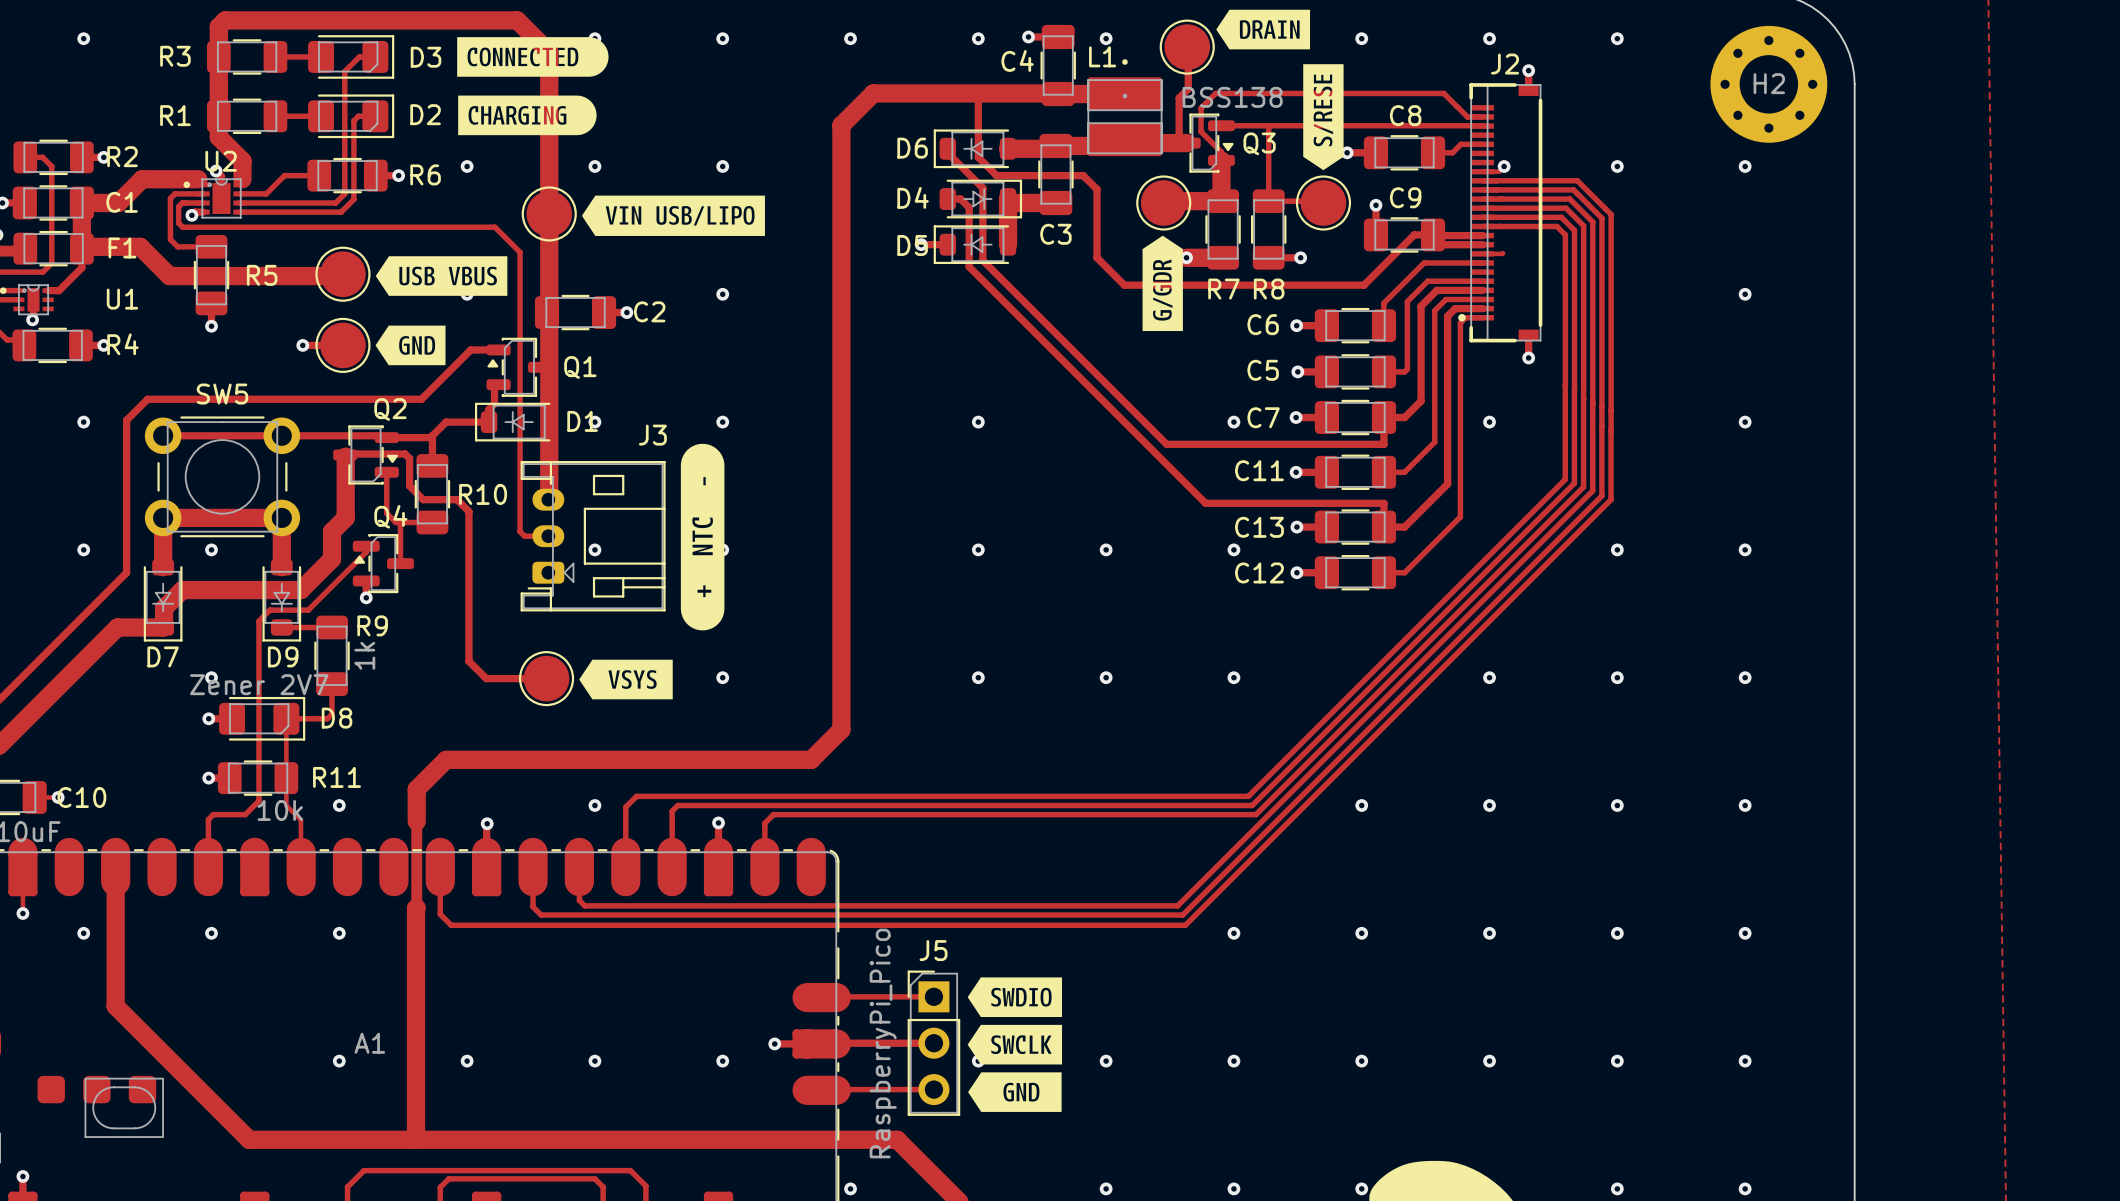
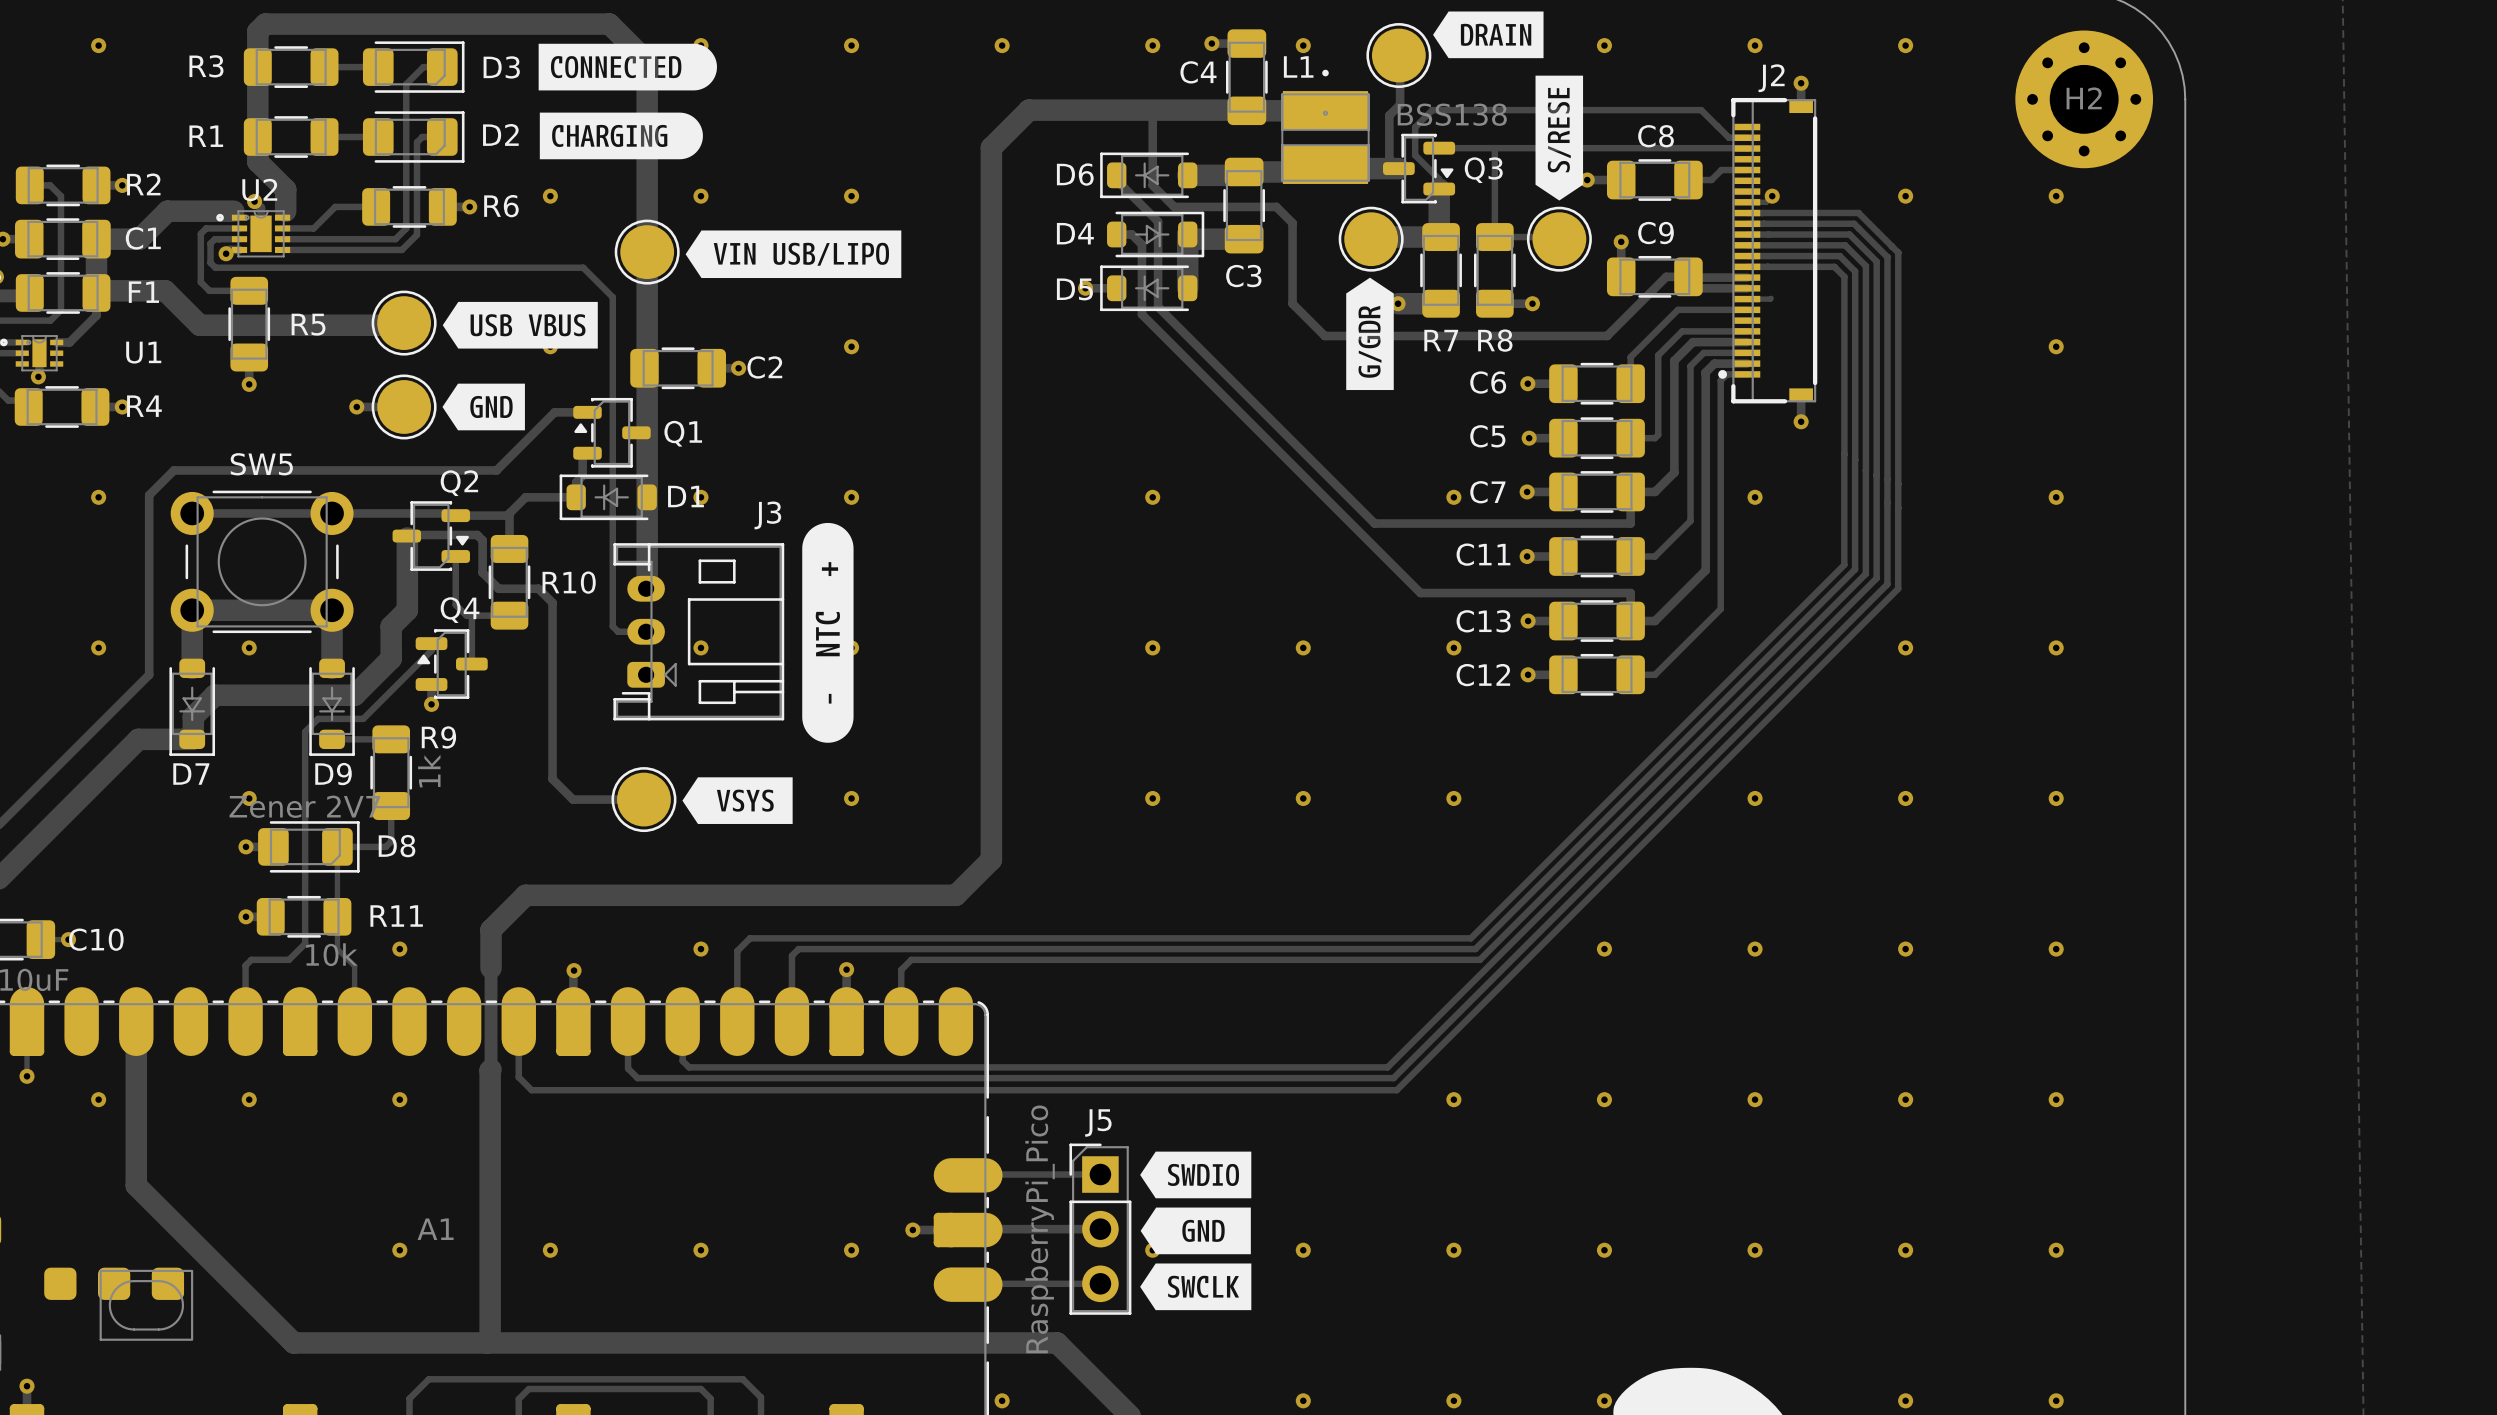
drawing shape: [680, 443, 725, 631] -> [802, 522, 854, 743]
drawing position: (1014, 1044) -> (1195, 1286)
drawing position: (1014, 1092) -> (1195, 1230)

